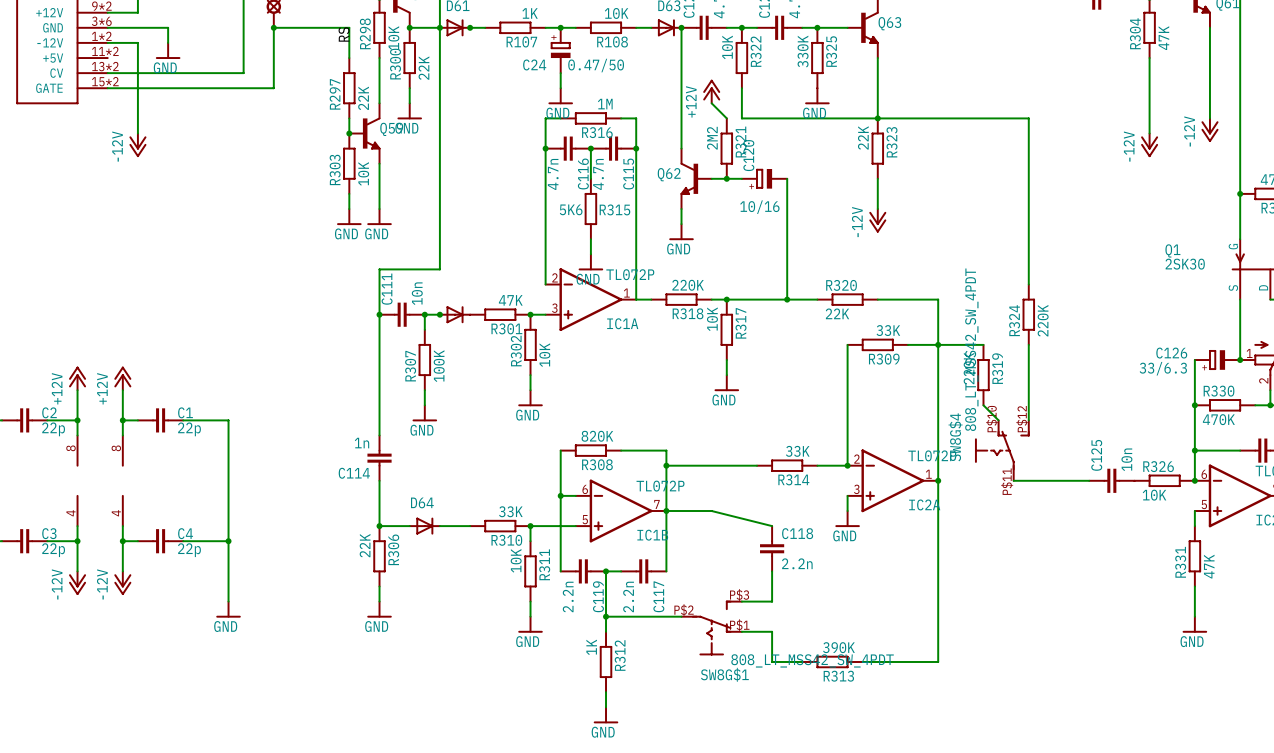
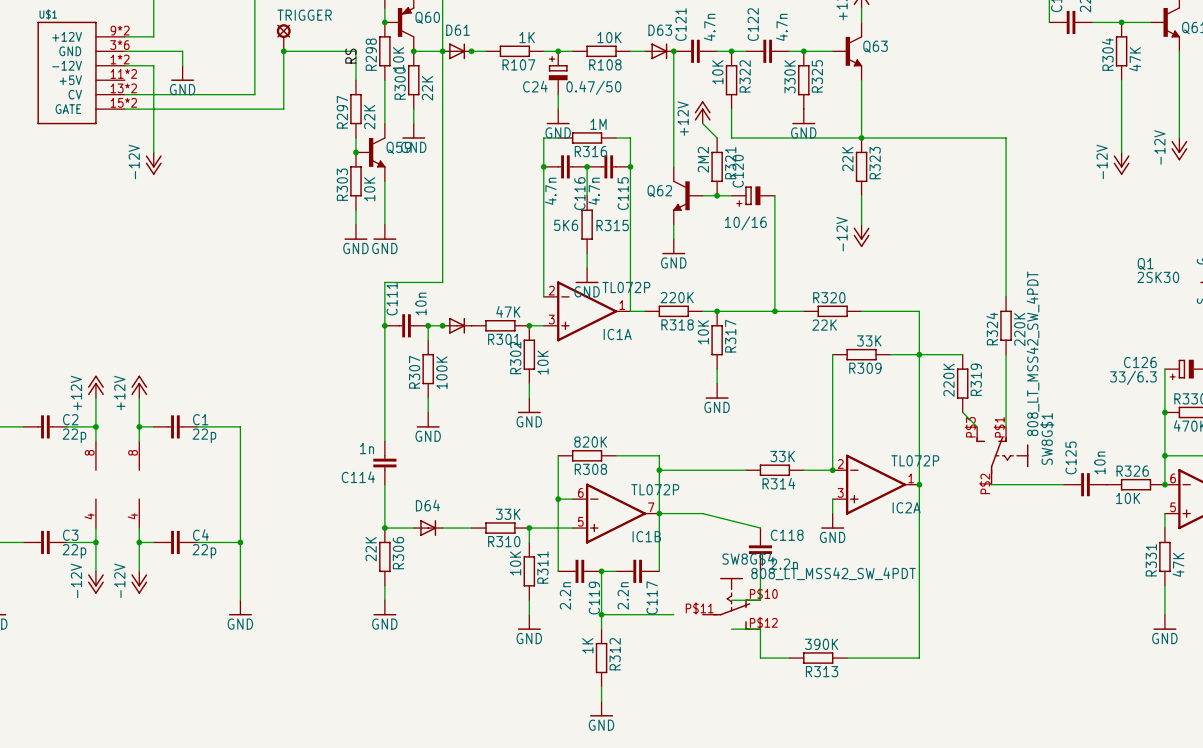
SW8G$4 rotation: 0° (1002, 450) -> 90° clockwise (731, 603)
SW8G$4 position: (1002, 450) -> (731, 603)
SW8G$1 rotation: 0° (711, 628) -> 90° counterclockwise (1002, 455)
SW8G$1 position: (711, 628) -> (1002, 455)

